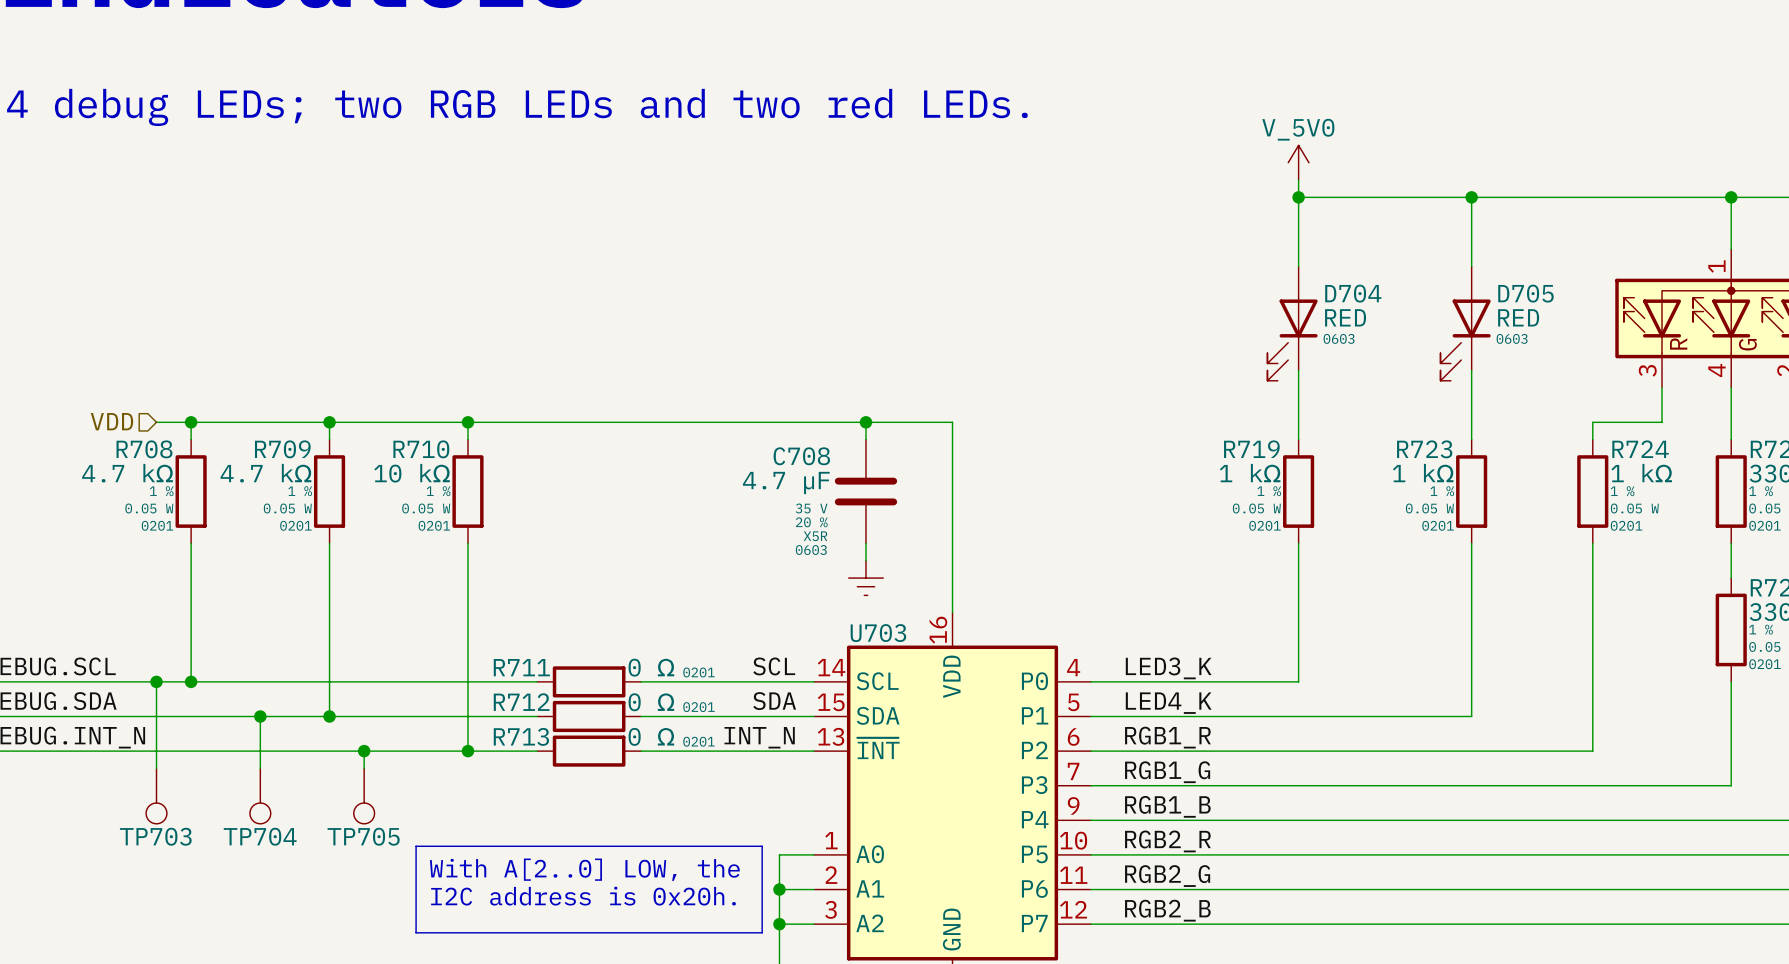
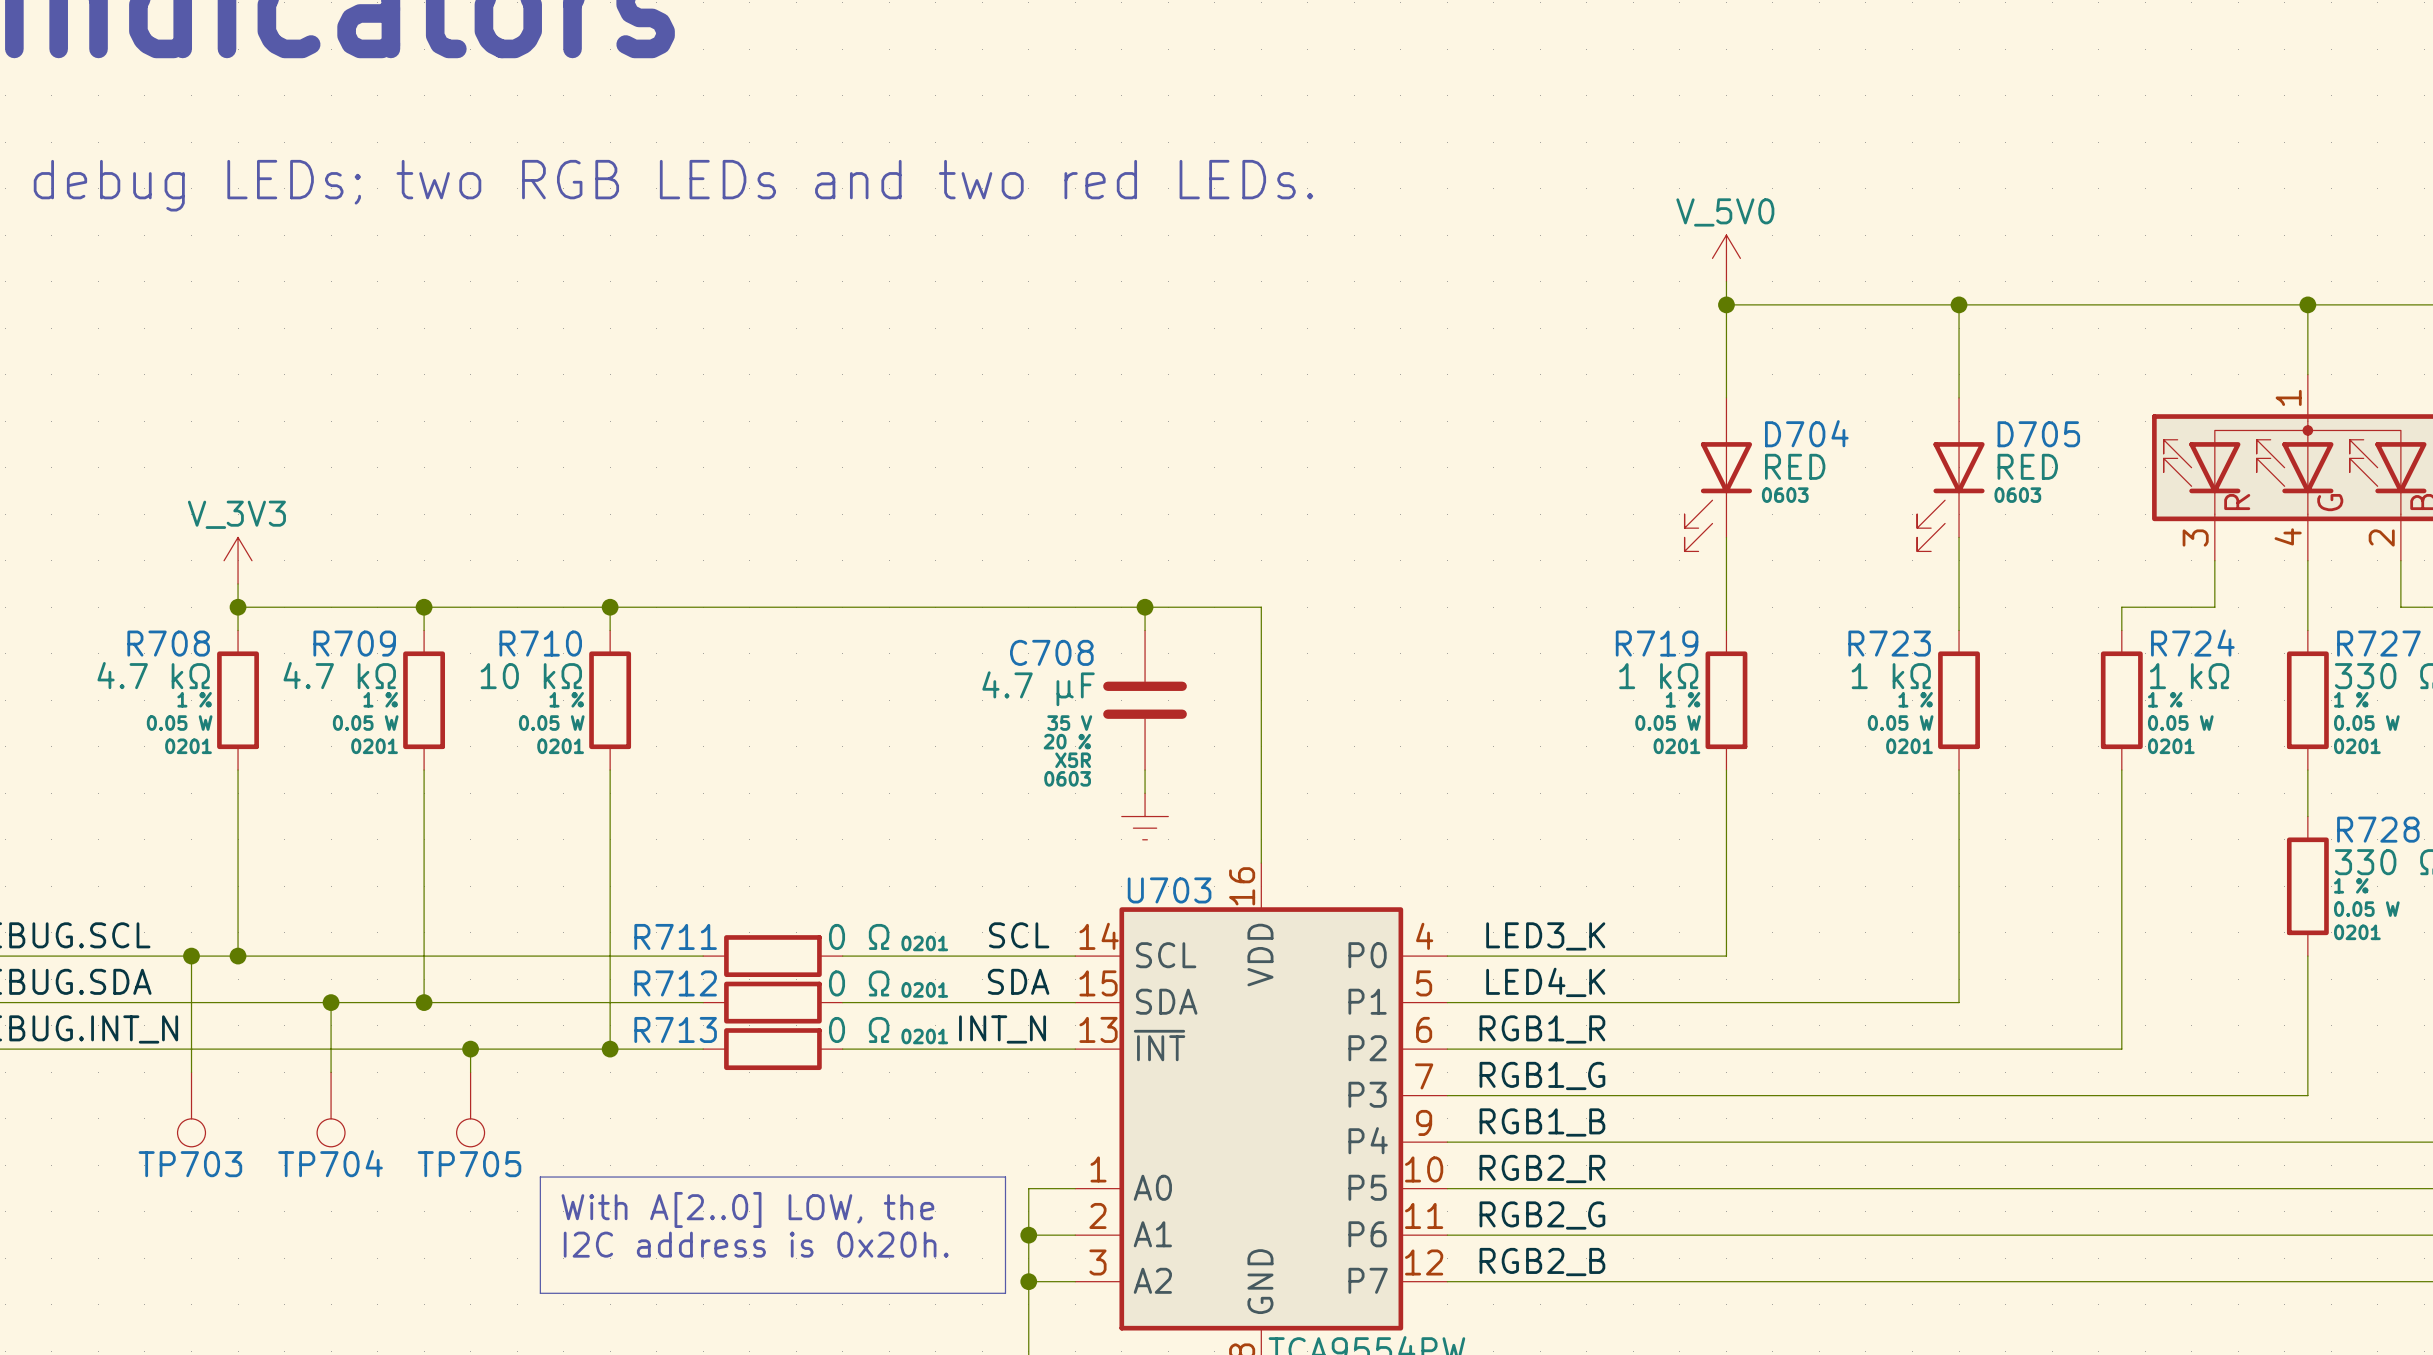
power symbol: none -> V_3V3 (238, 560)
hierarchical label: VDD (111, 421) -> none
wire: (156, 422) (191, 422) -> (238, 583) (238, 607)

